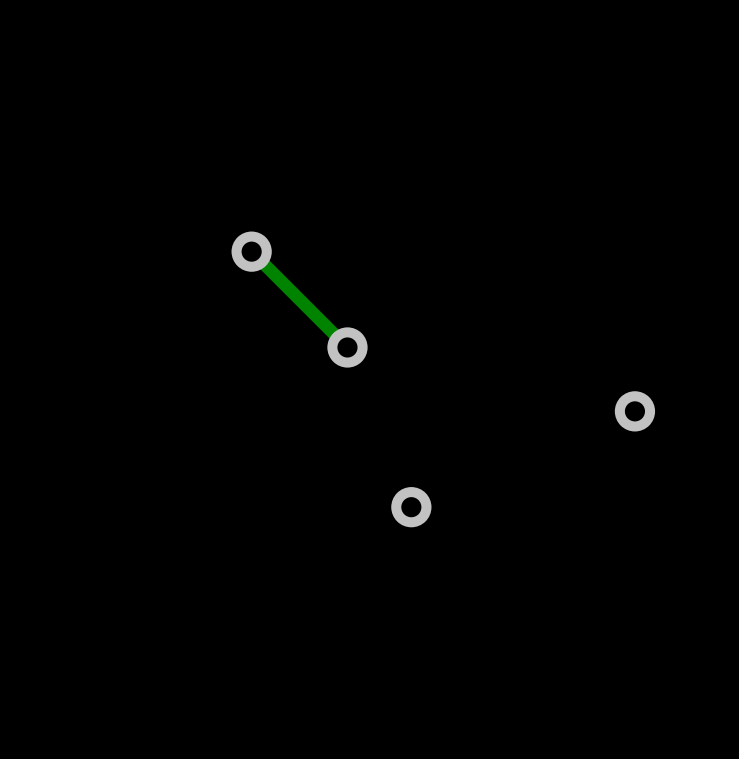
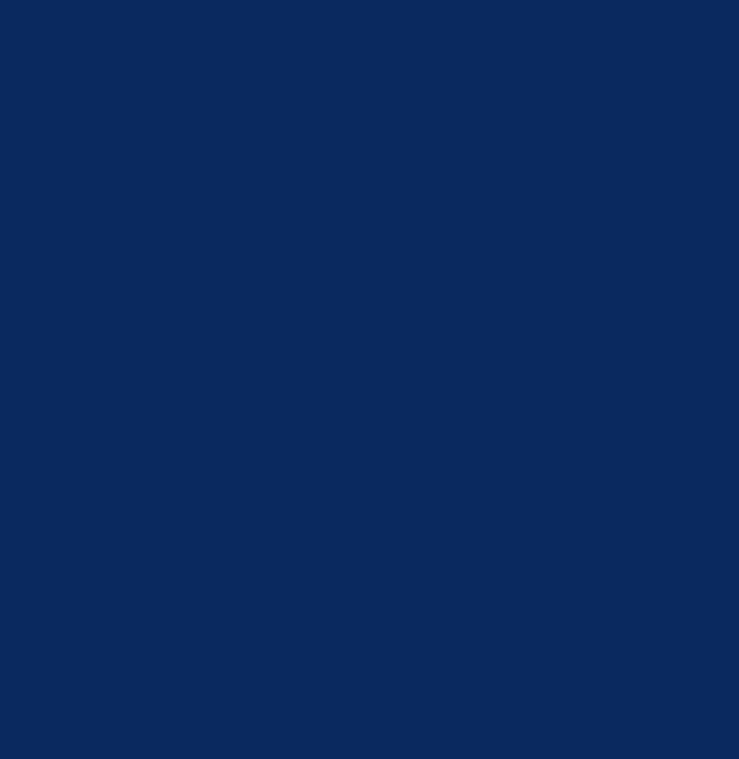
track: (251, 251) (347, 347) -> none
via: (251, 251) -> none
via: (347, 347) -> none
via: (634, 411) -> none
via: (411, 507) -> none

